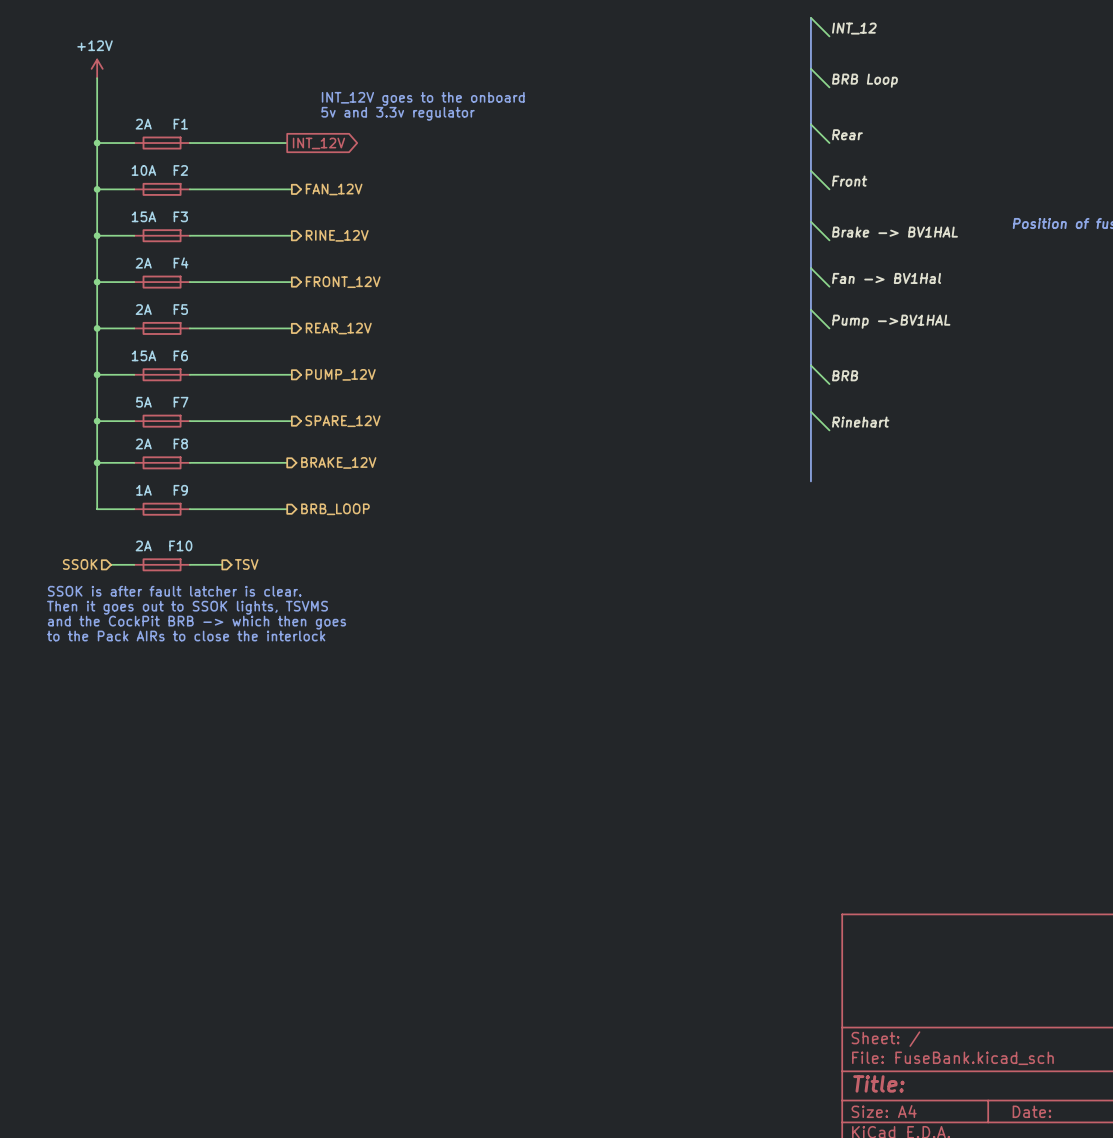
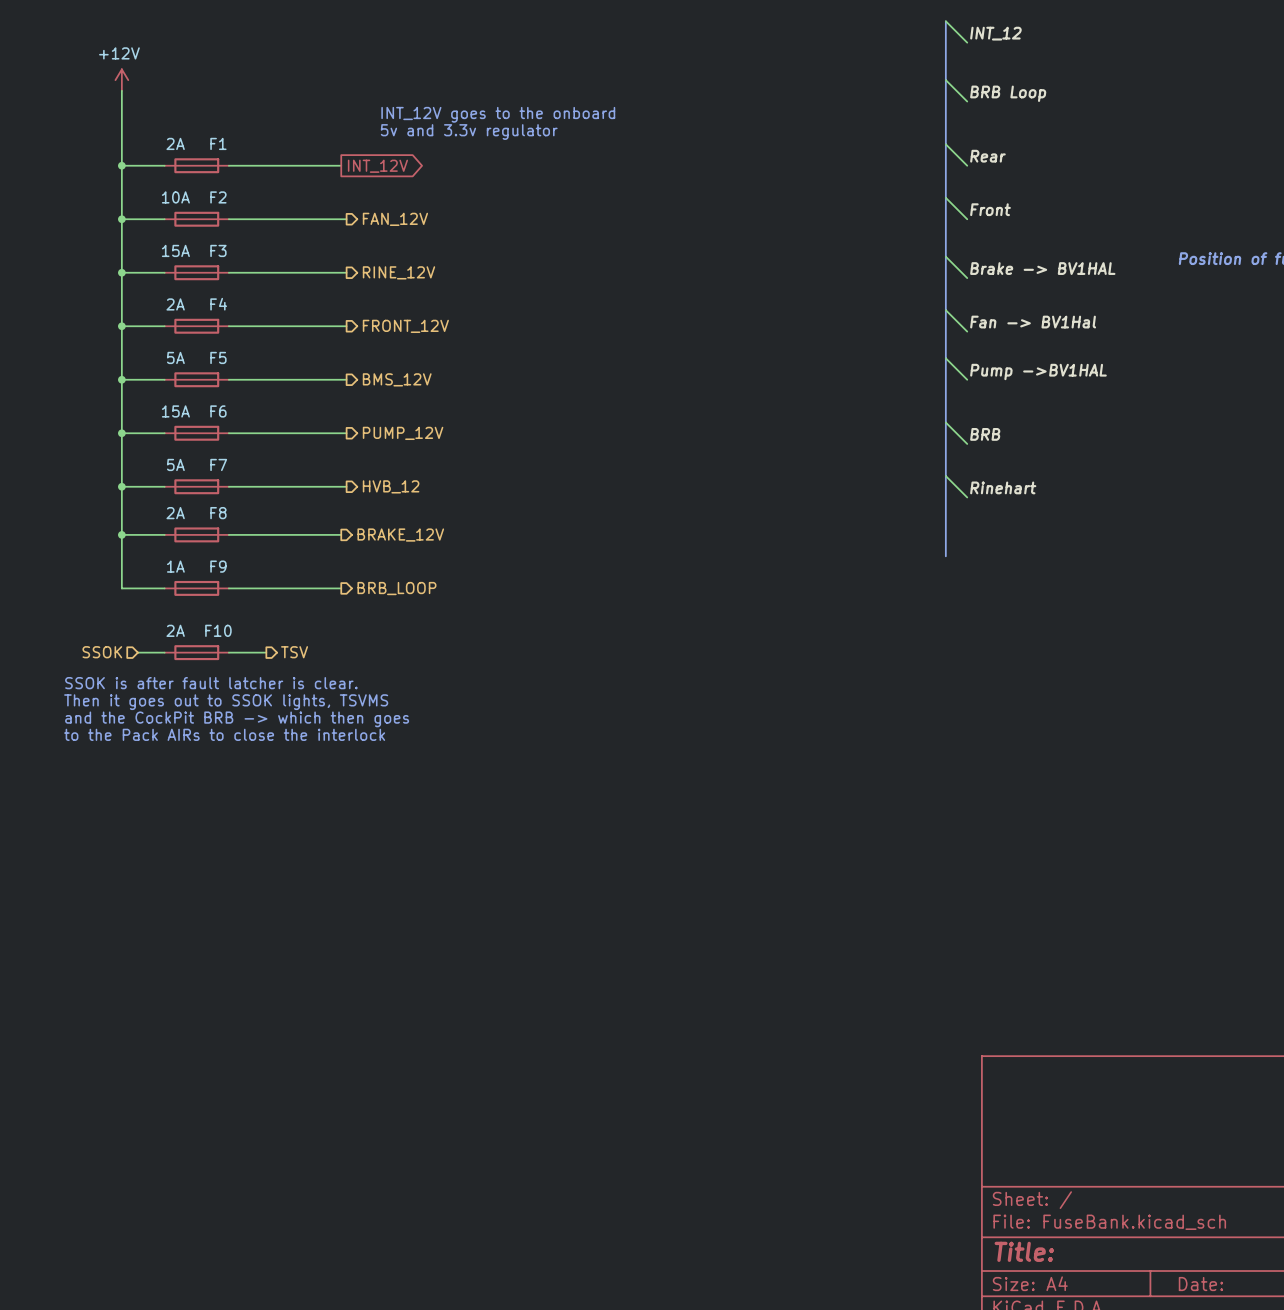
F5 value: 2A (143, 309) -> 5A (175, 357)
hierarchical label: REAR_12V (338, 328) -> BMS_12V (397, 379)
hierarchical label: SPARE_12V (342, 421) -> HVB_12 (391, 486)

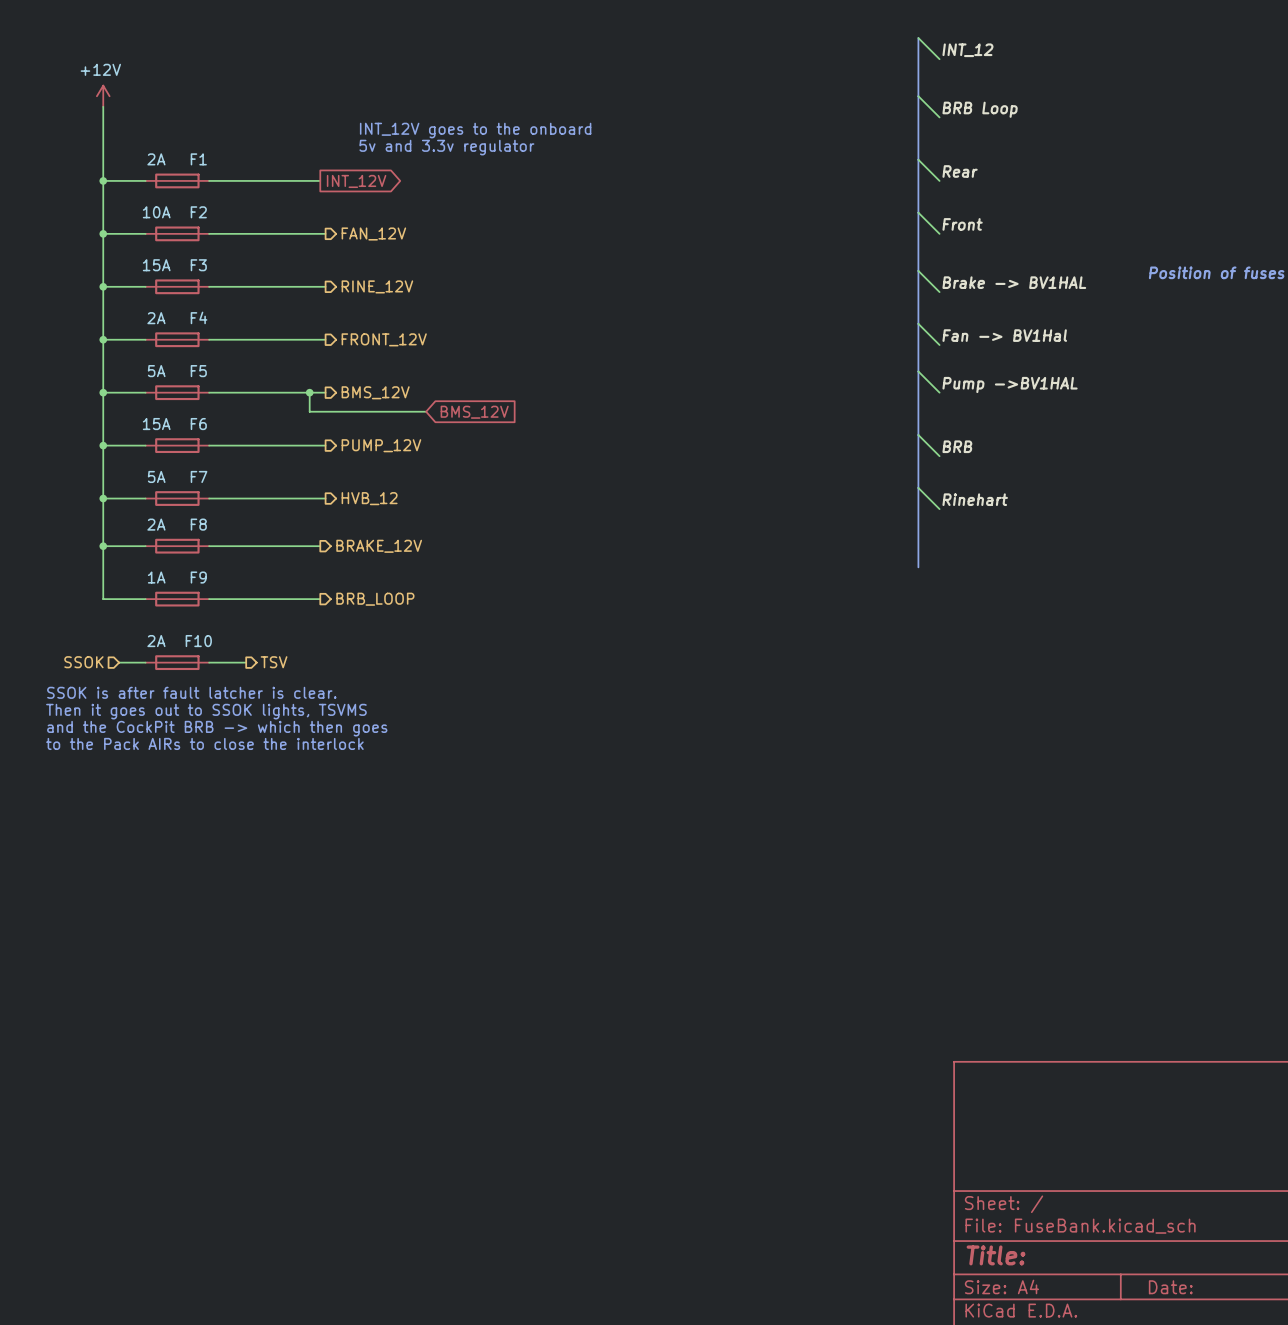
wire: none -> (309, 392) (309, 411) (426, 411)
junction: none -> (309, 392)
global label: none -> BMS_12V (474, 412)

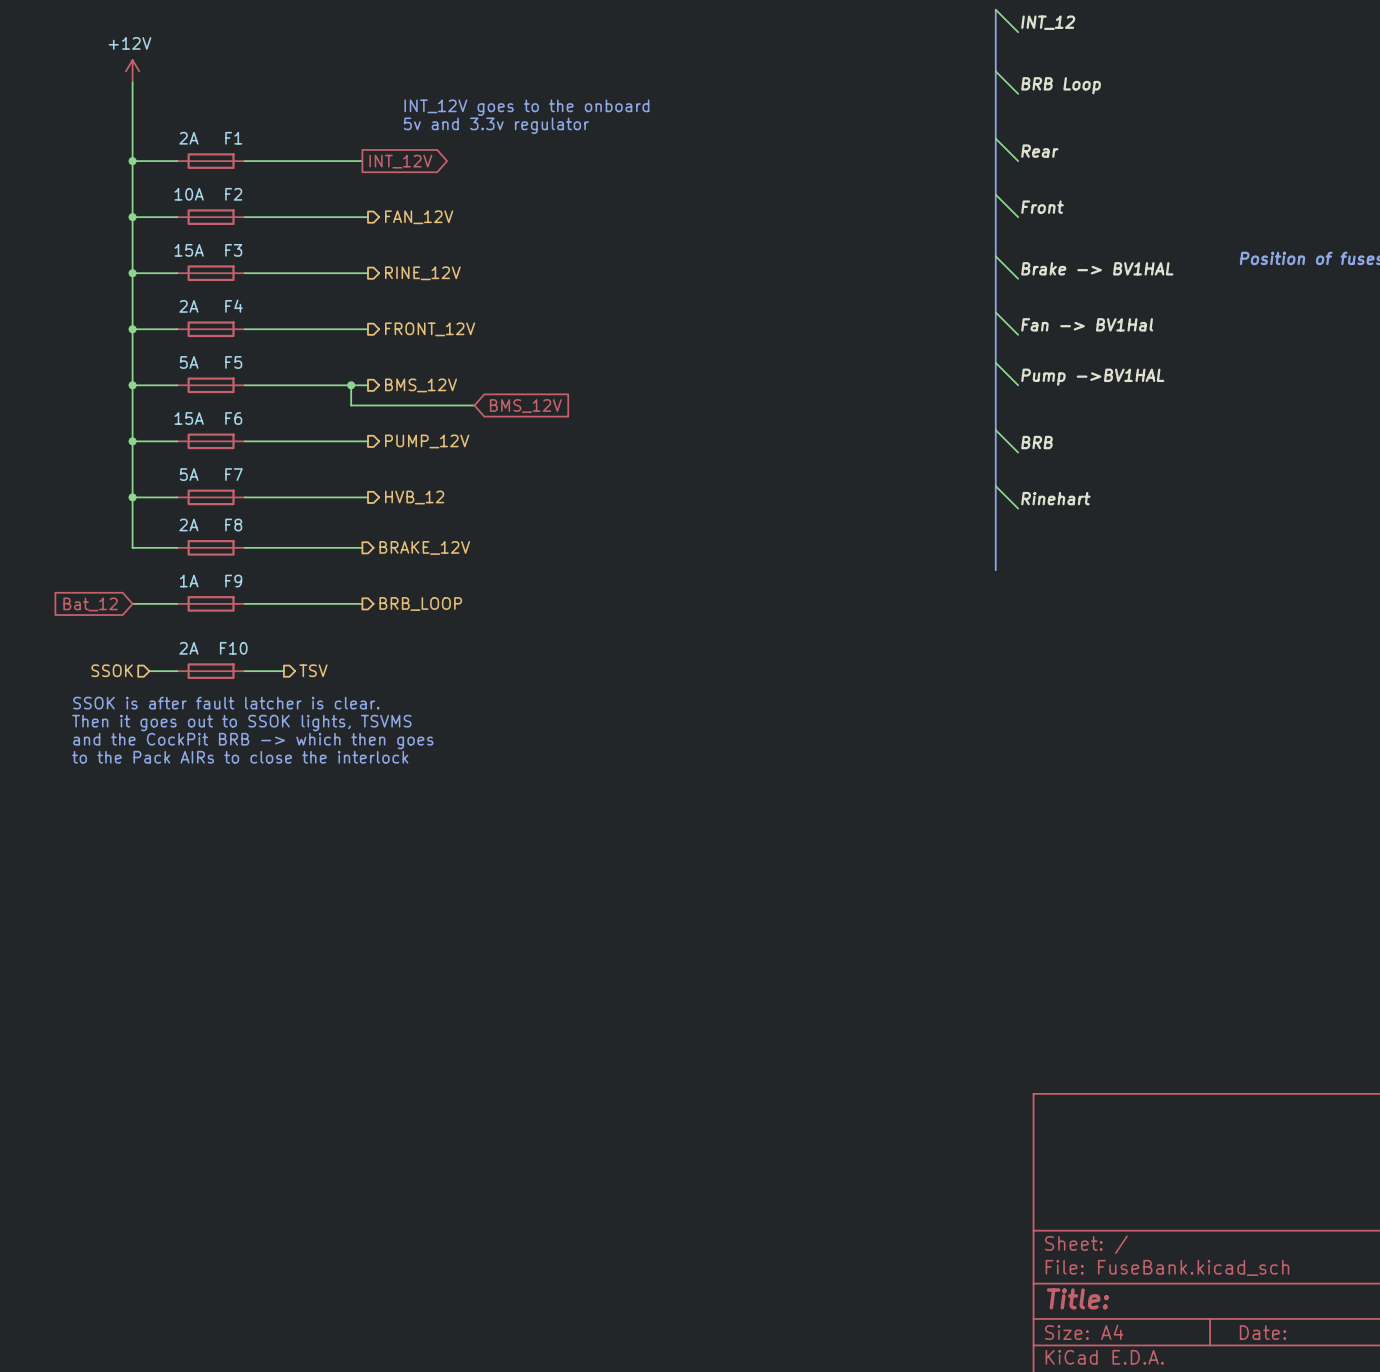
wire: (103, 546) (103, 599) -> none
junction: (103, 546) -> none
global label: none -> Bat_12 (90, 604)

